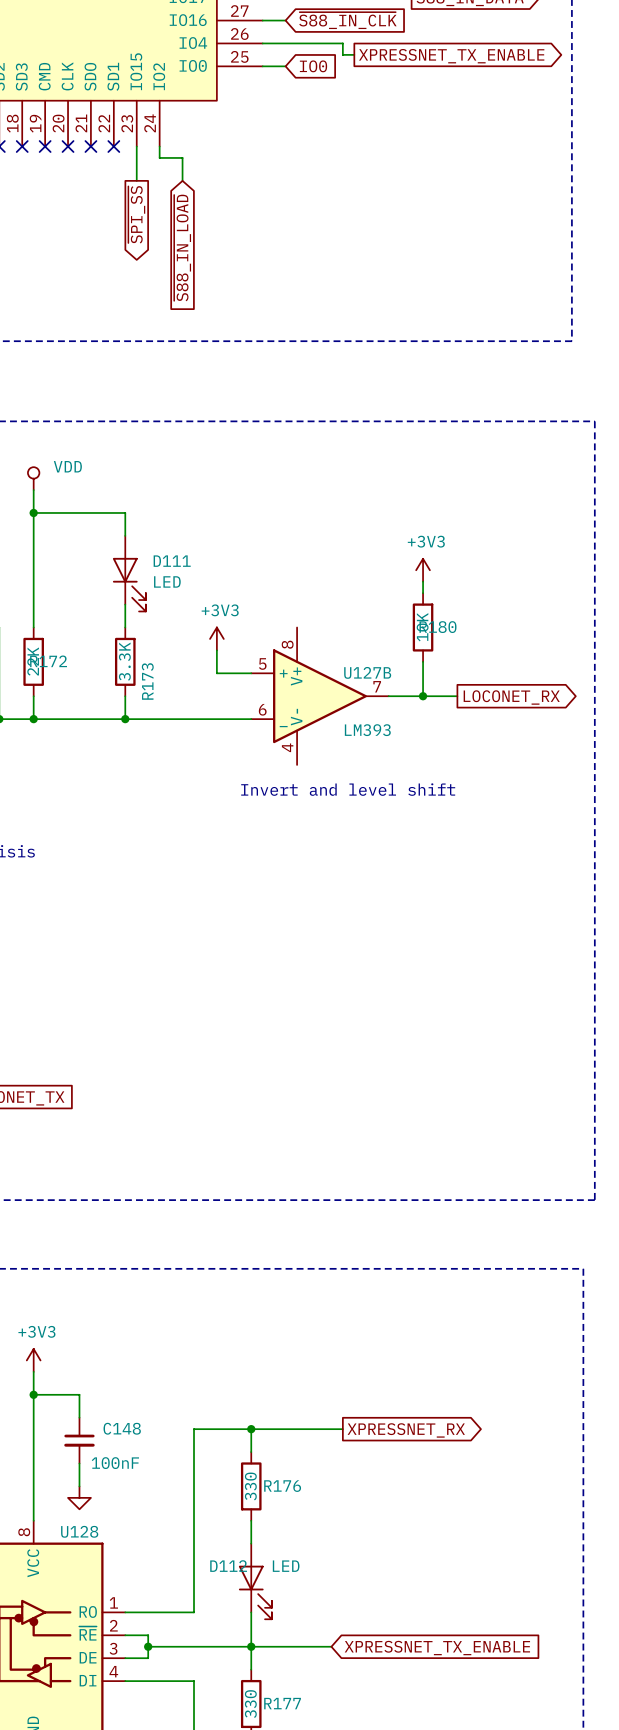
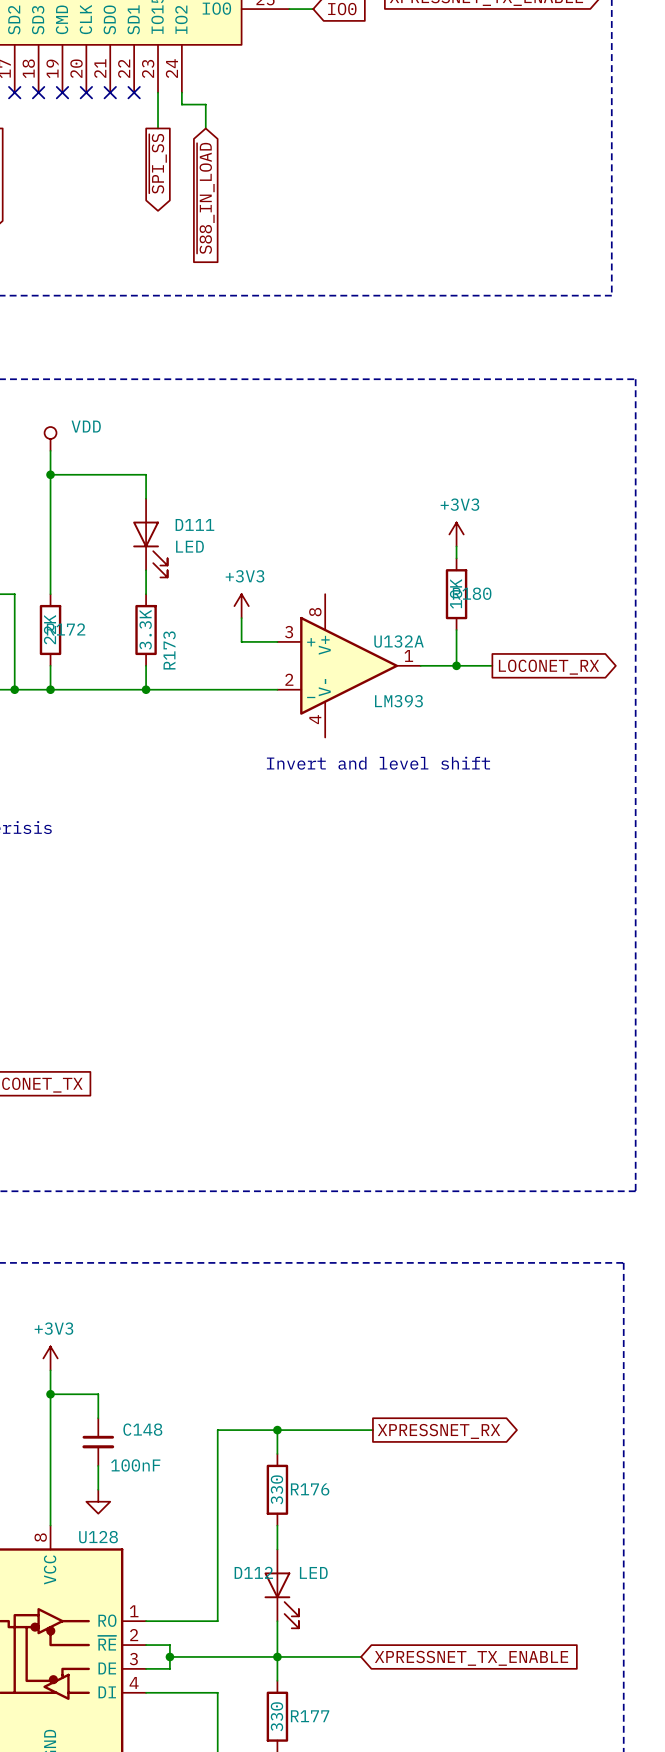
U127B pin number: 5 (262, 663) -> 3 (289, 632)
U127B name: U127B (367, 672) -> U132A (399, 641)
U127B pin number: 7 (377, 686) -> 1 (408, 655)
U127B pin number: 6 (262, 709) -> 2 (289, 679)

